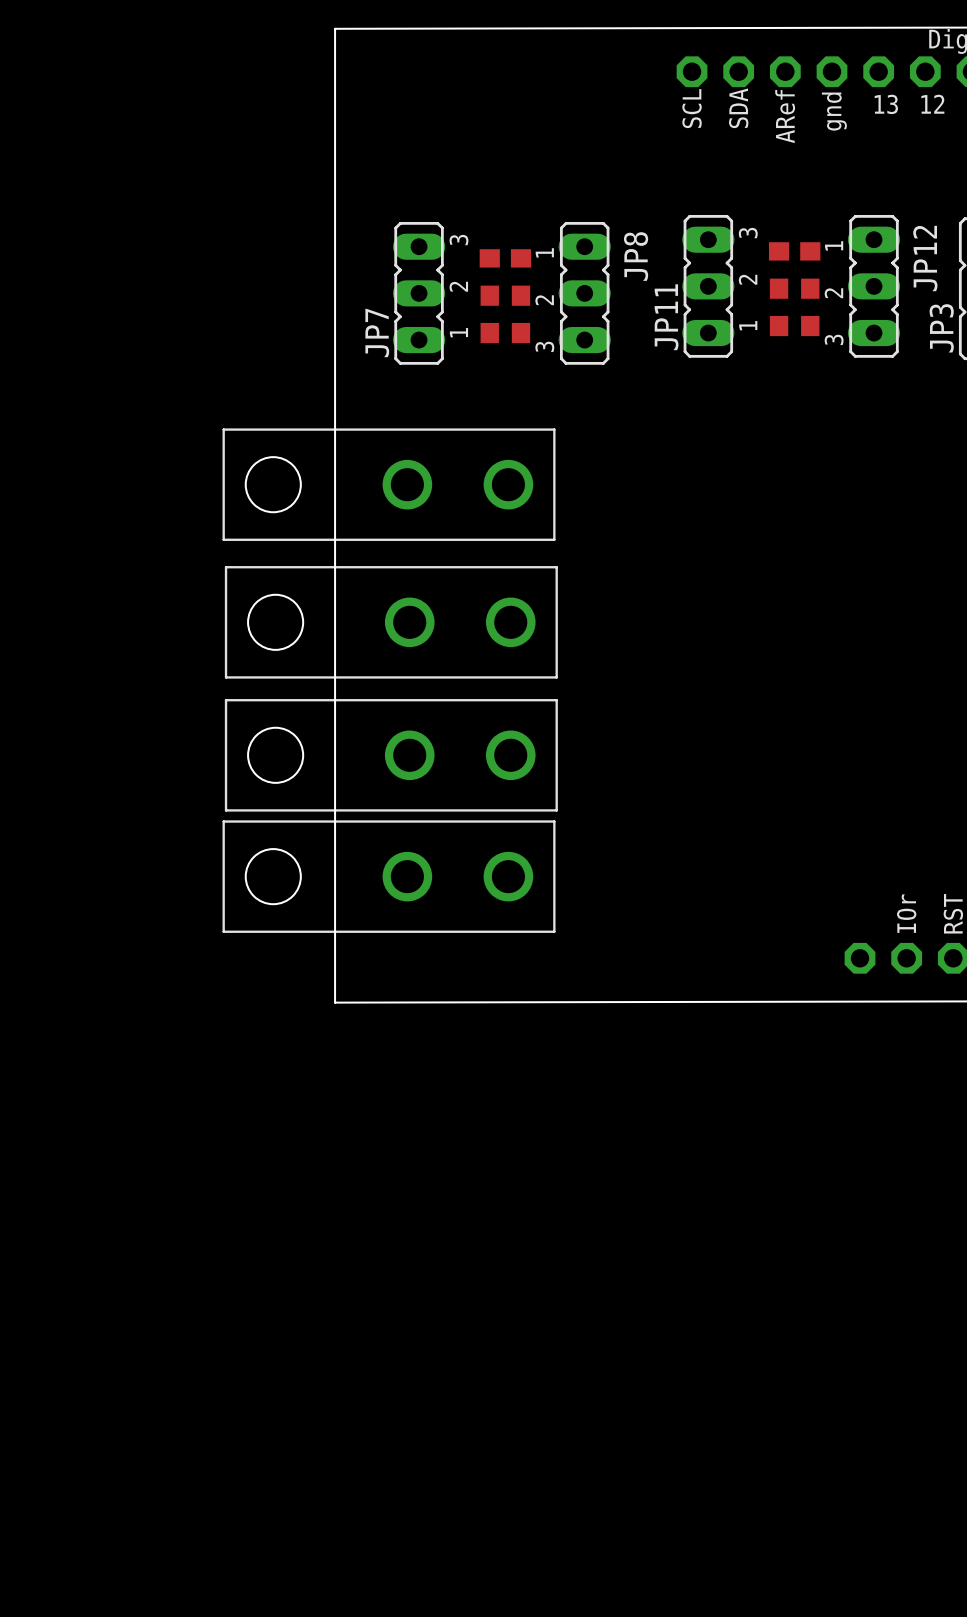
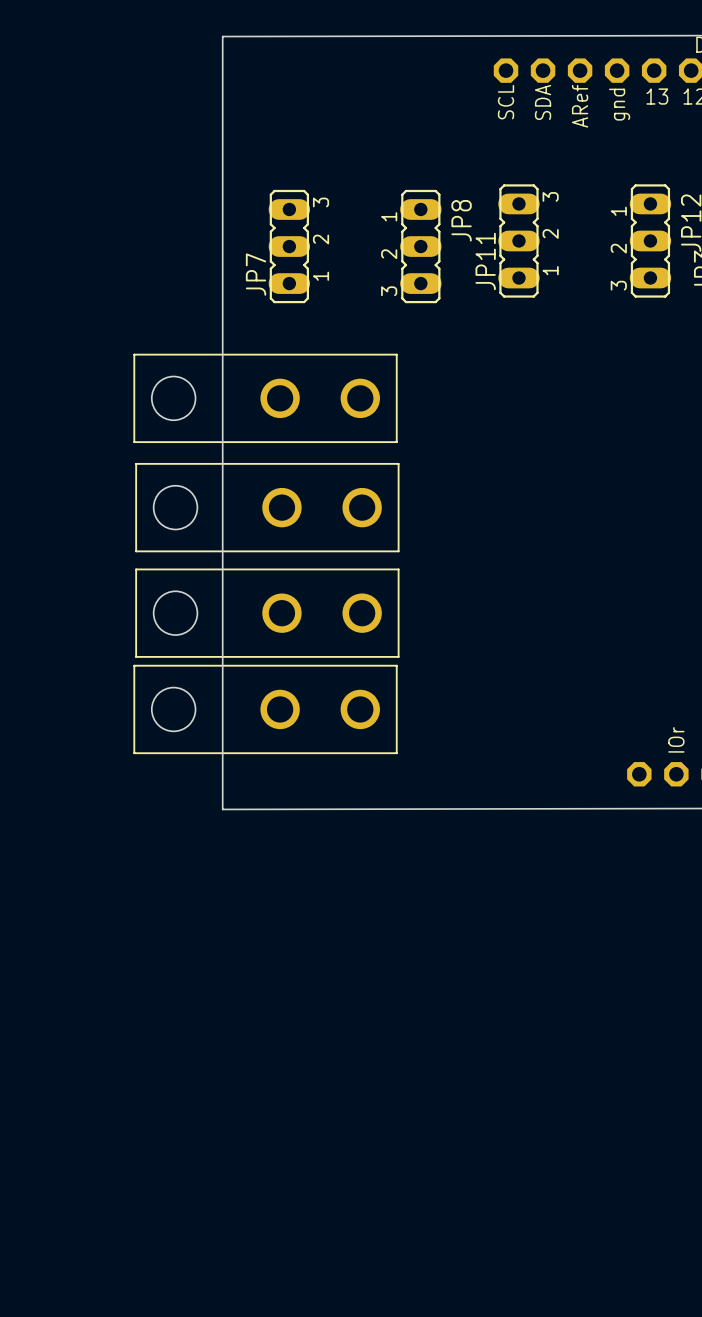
part: (794, 251) -> none
part: (505, 258) -> none
part: (794, 288) -> none
part: (505, 295) -> none
part: (794, 326) -> none
part: (505, 333) -> none

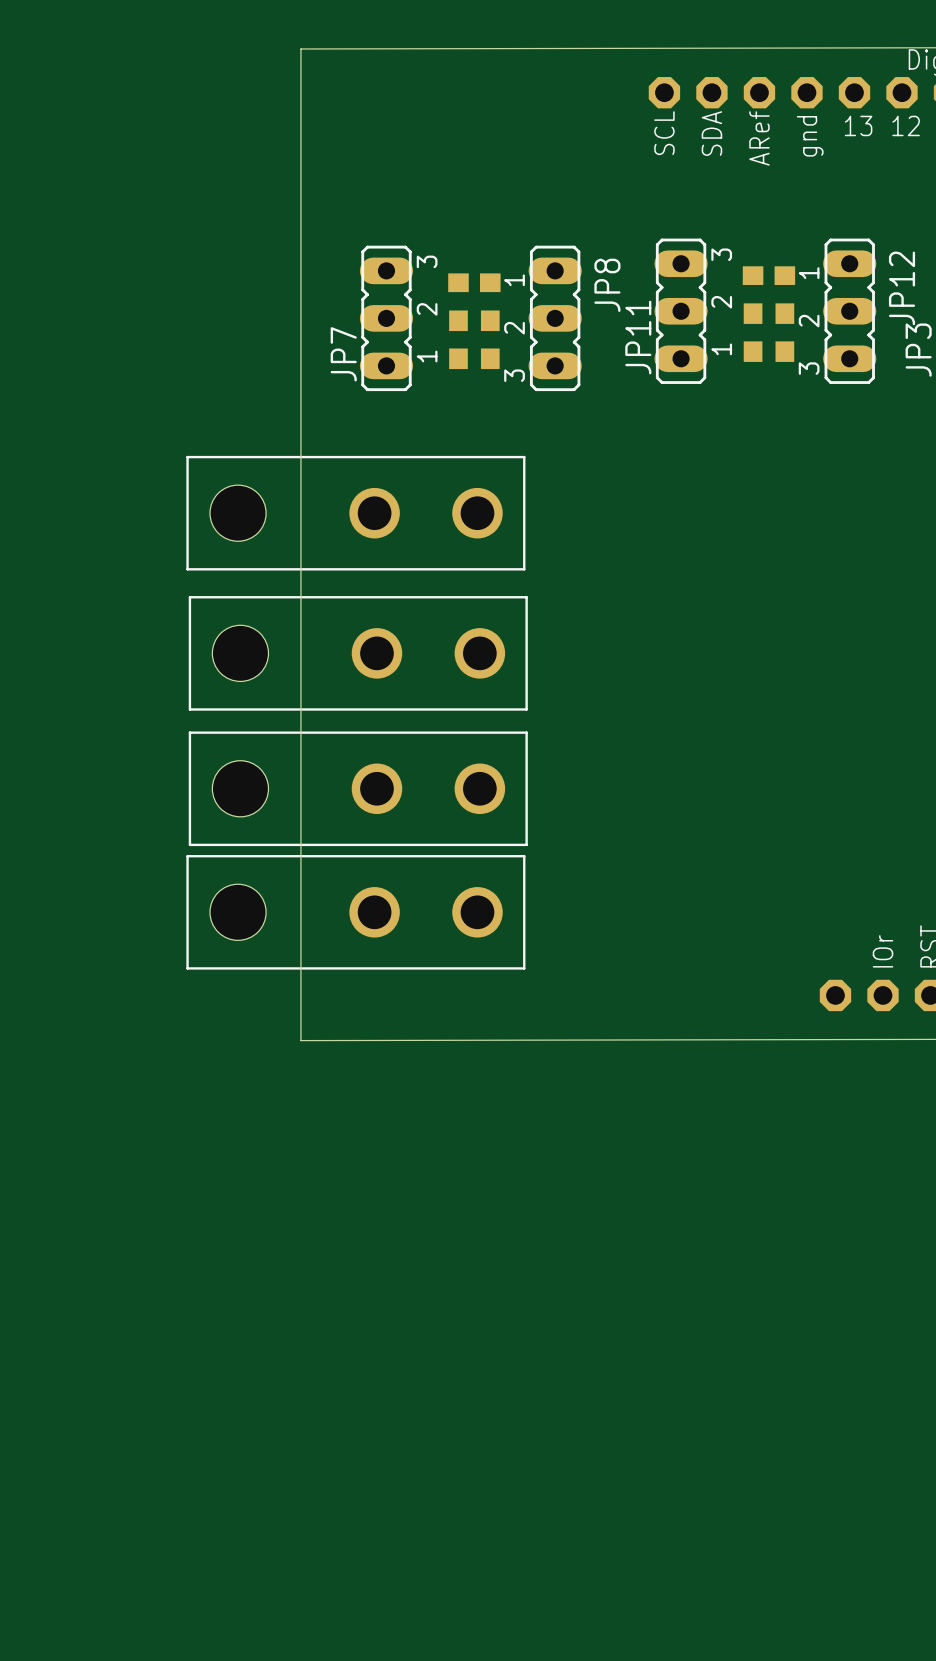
part: none -> (768, 275)
part: none -> (474, 282)
part: none -> (768, 313)
part: none -> (474, 320)
part: none -> (768, 351)
part: none -> (474, 358)

